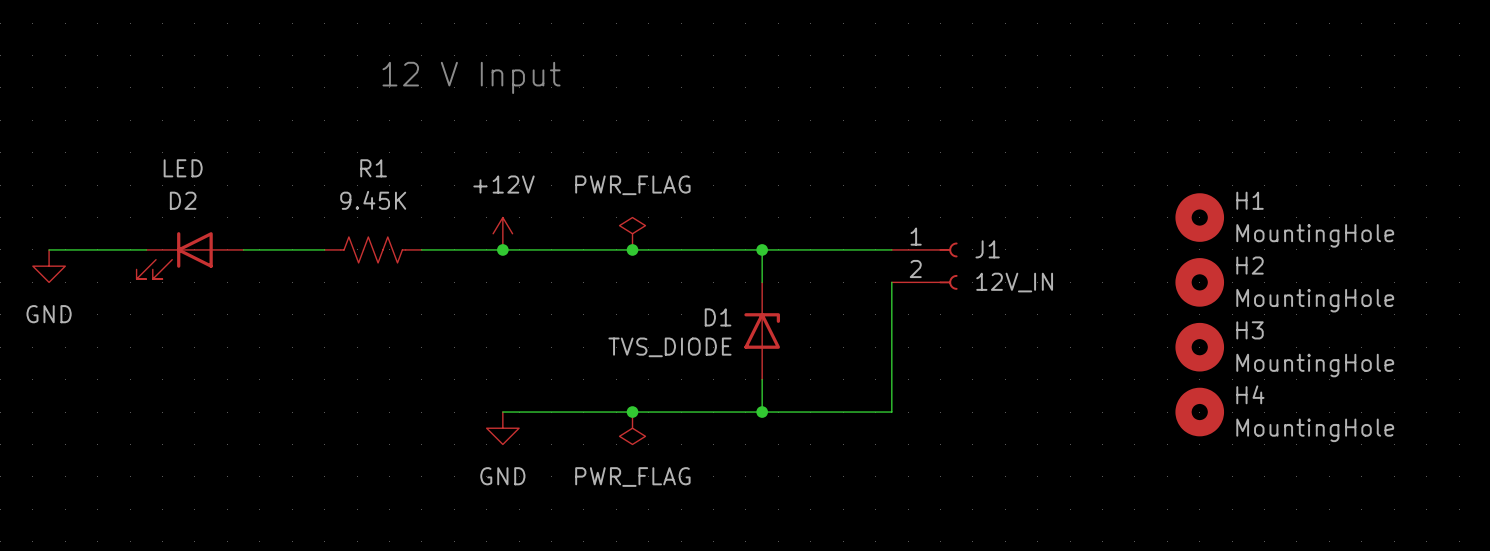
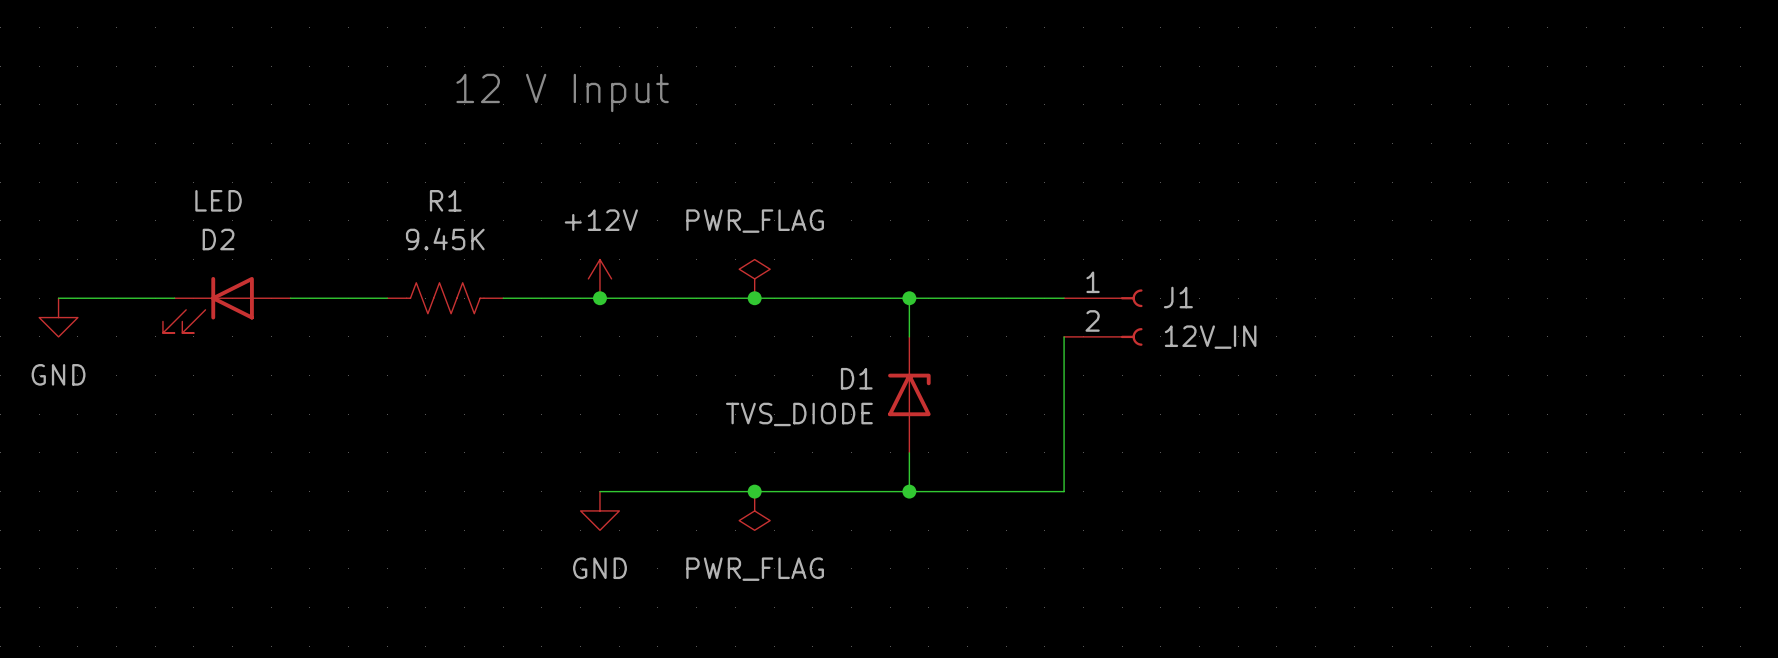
H1: MountingHole (1199, 217) -> none
H2: MountingHole (1199, 282) -> none
H3: MountingHole (1199, 347) -> none
H4: MountingHole (1199, 412) -> none

